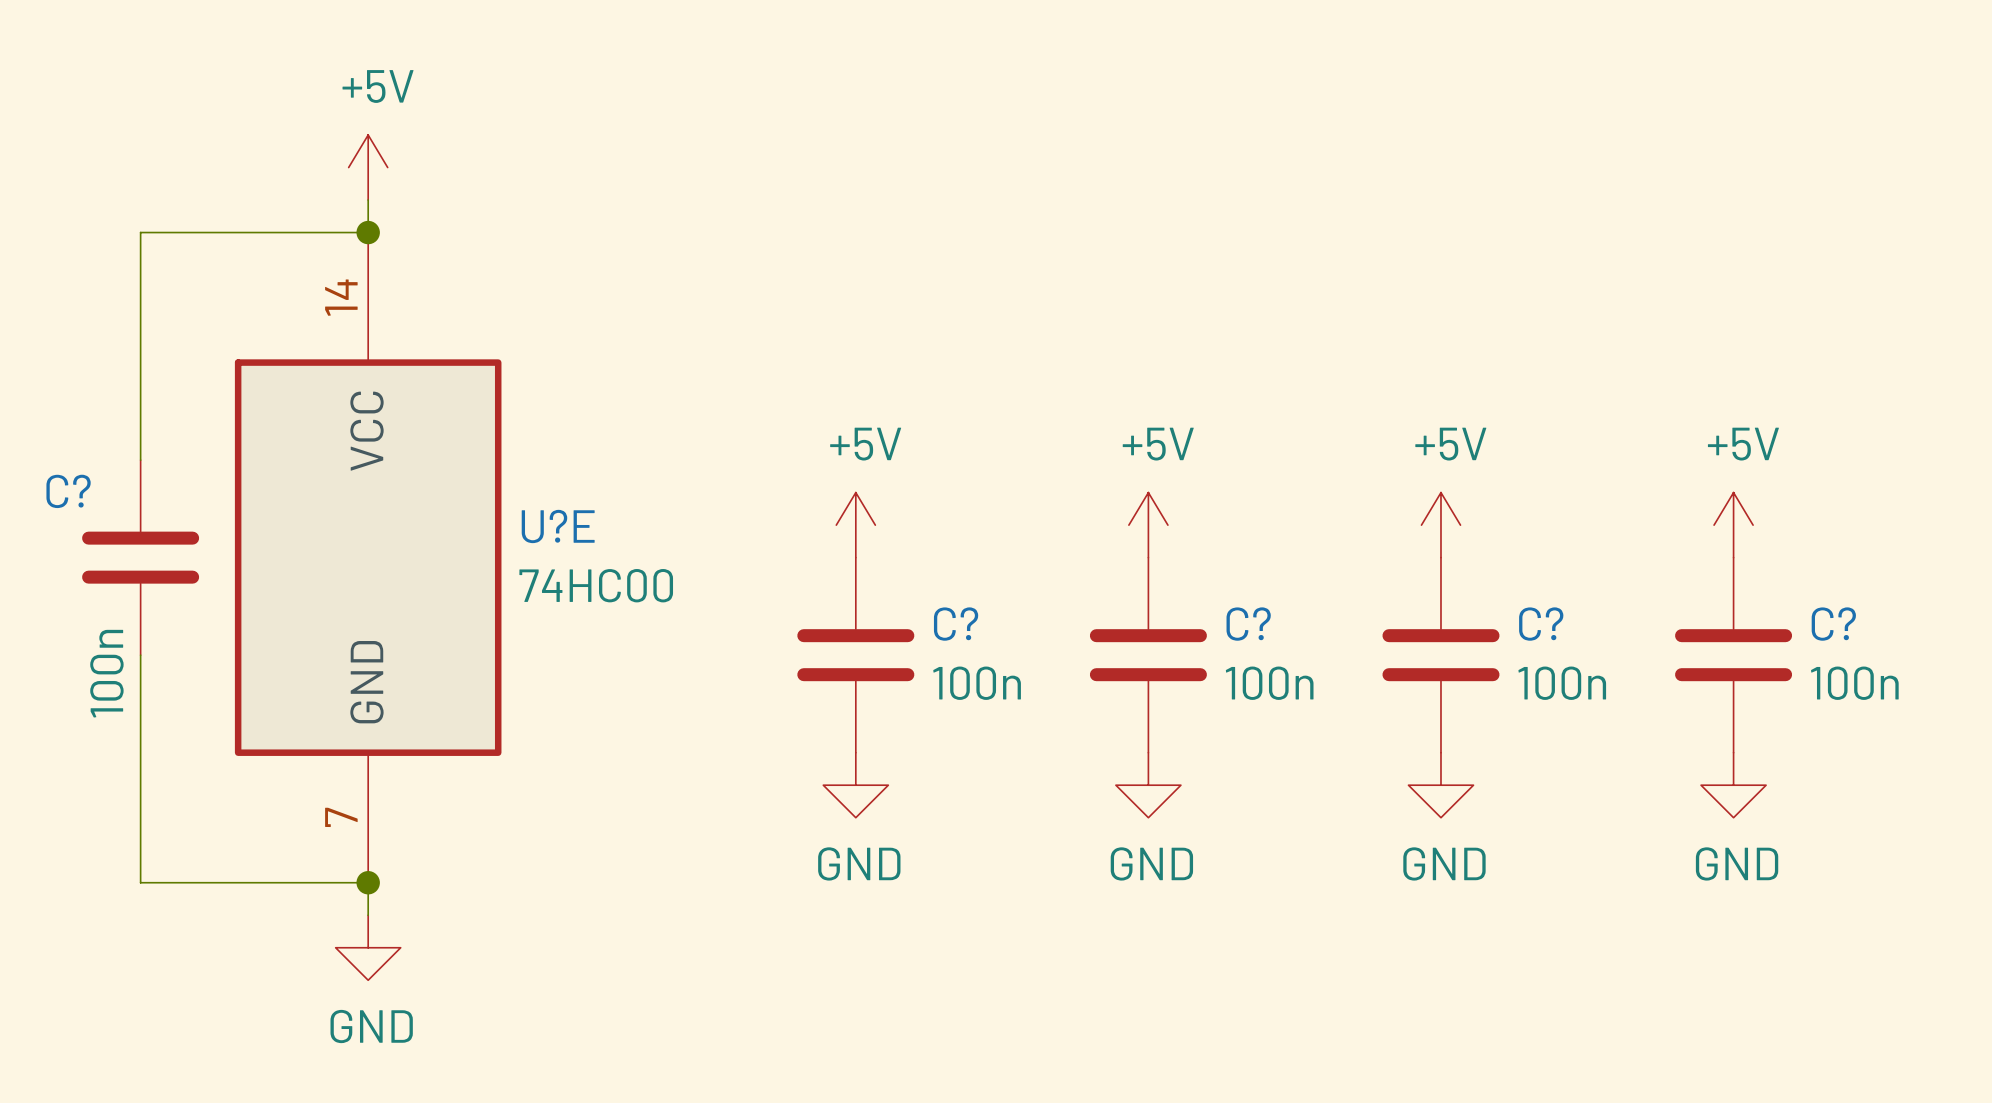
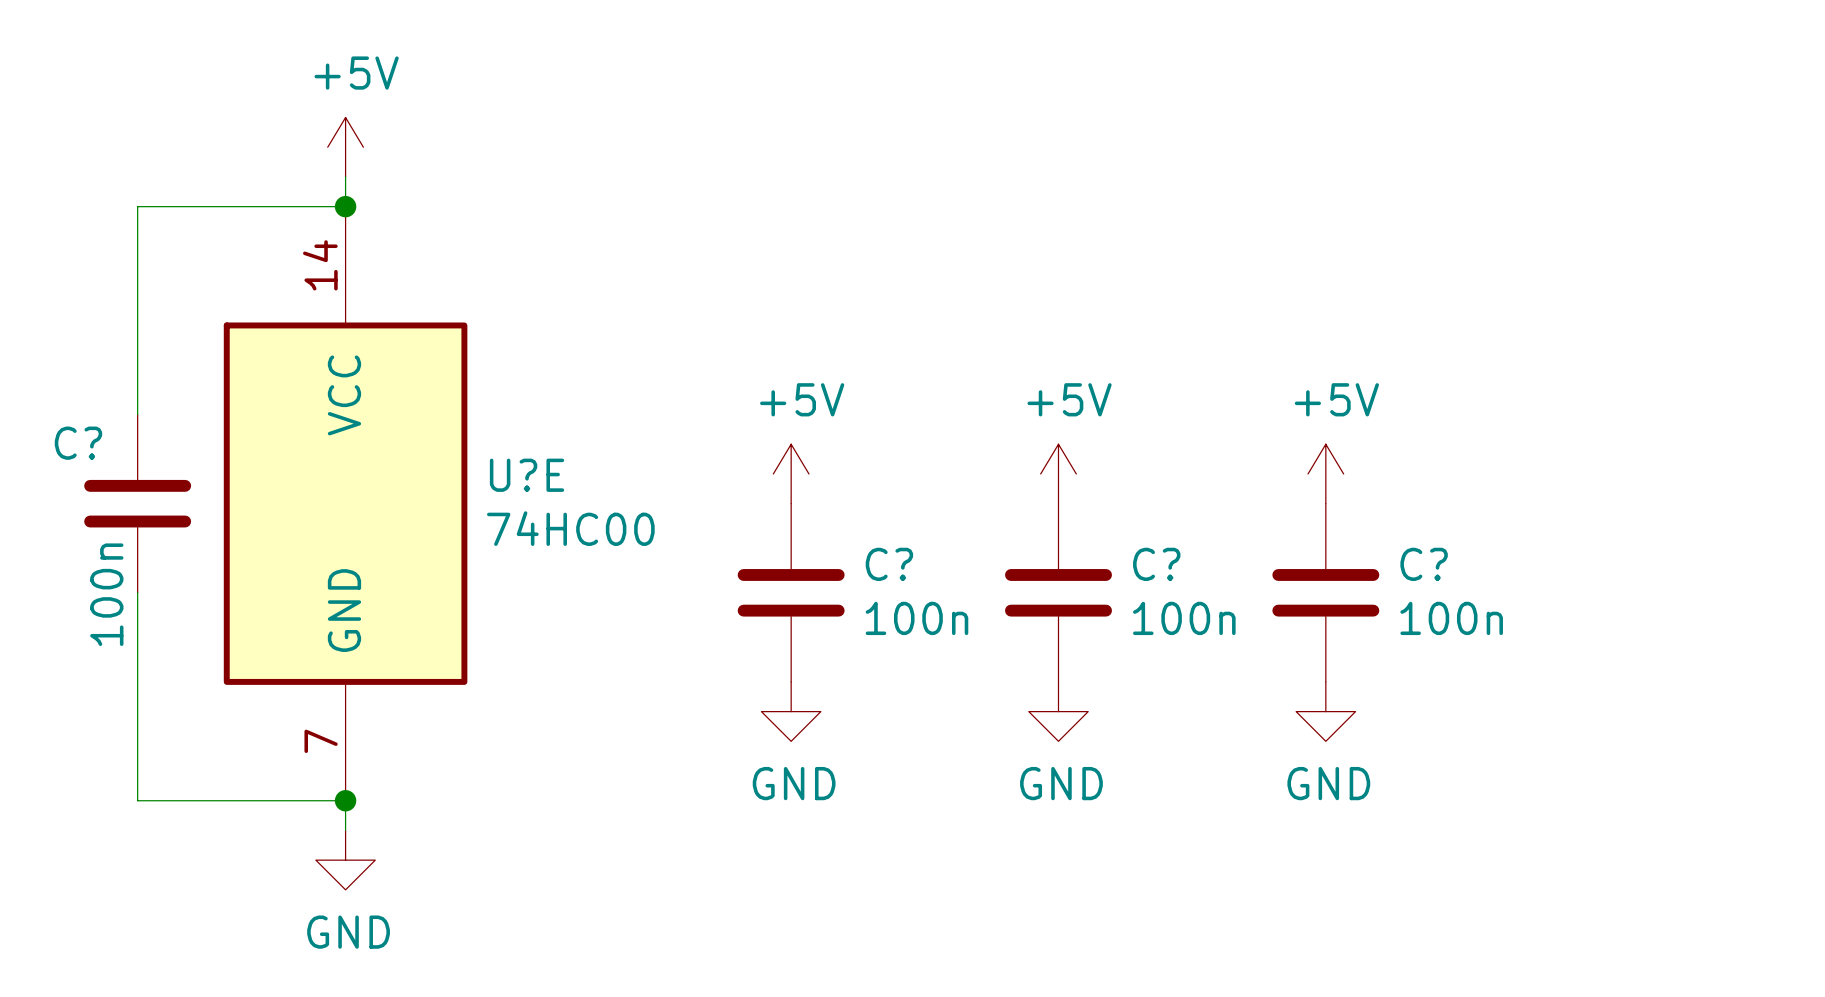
power symbol: +5V (1733, 525) -> none
C?: 100n (1733, 655) -> none
power symbol: GND (1733, 785) -> none

